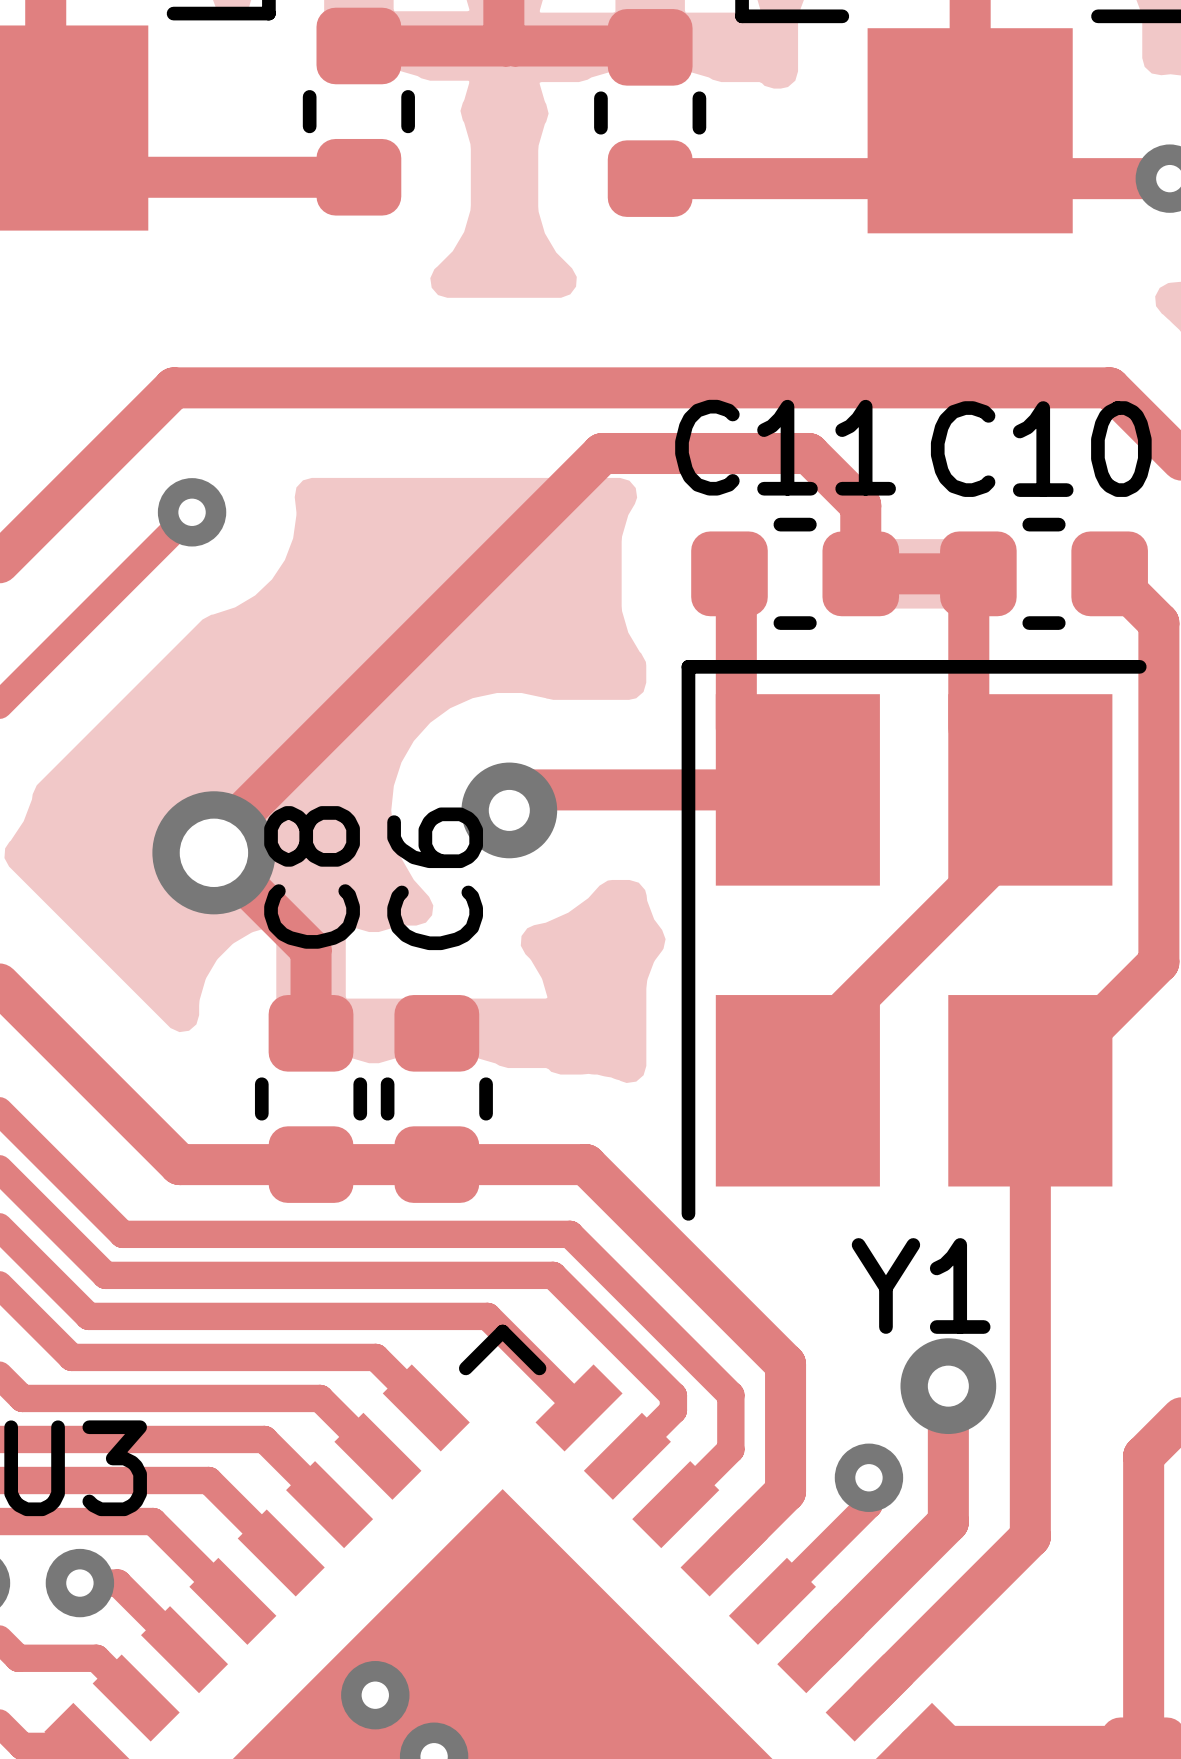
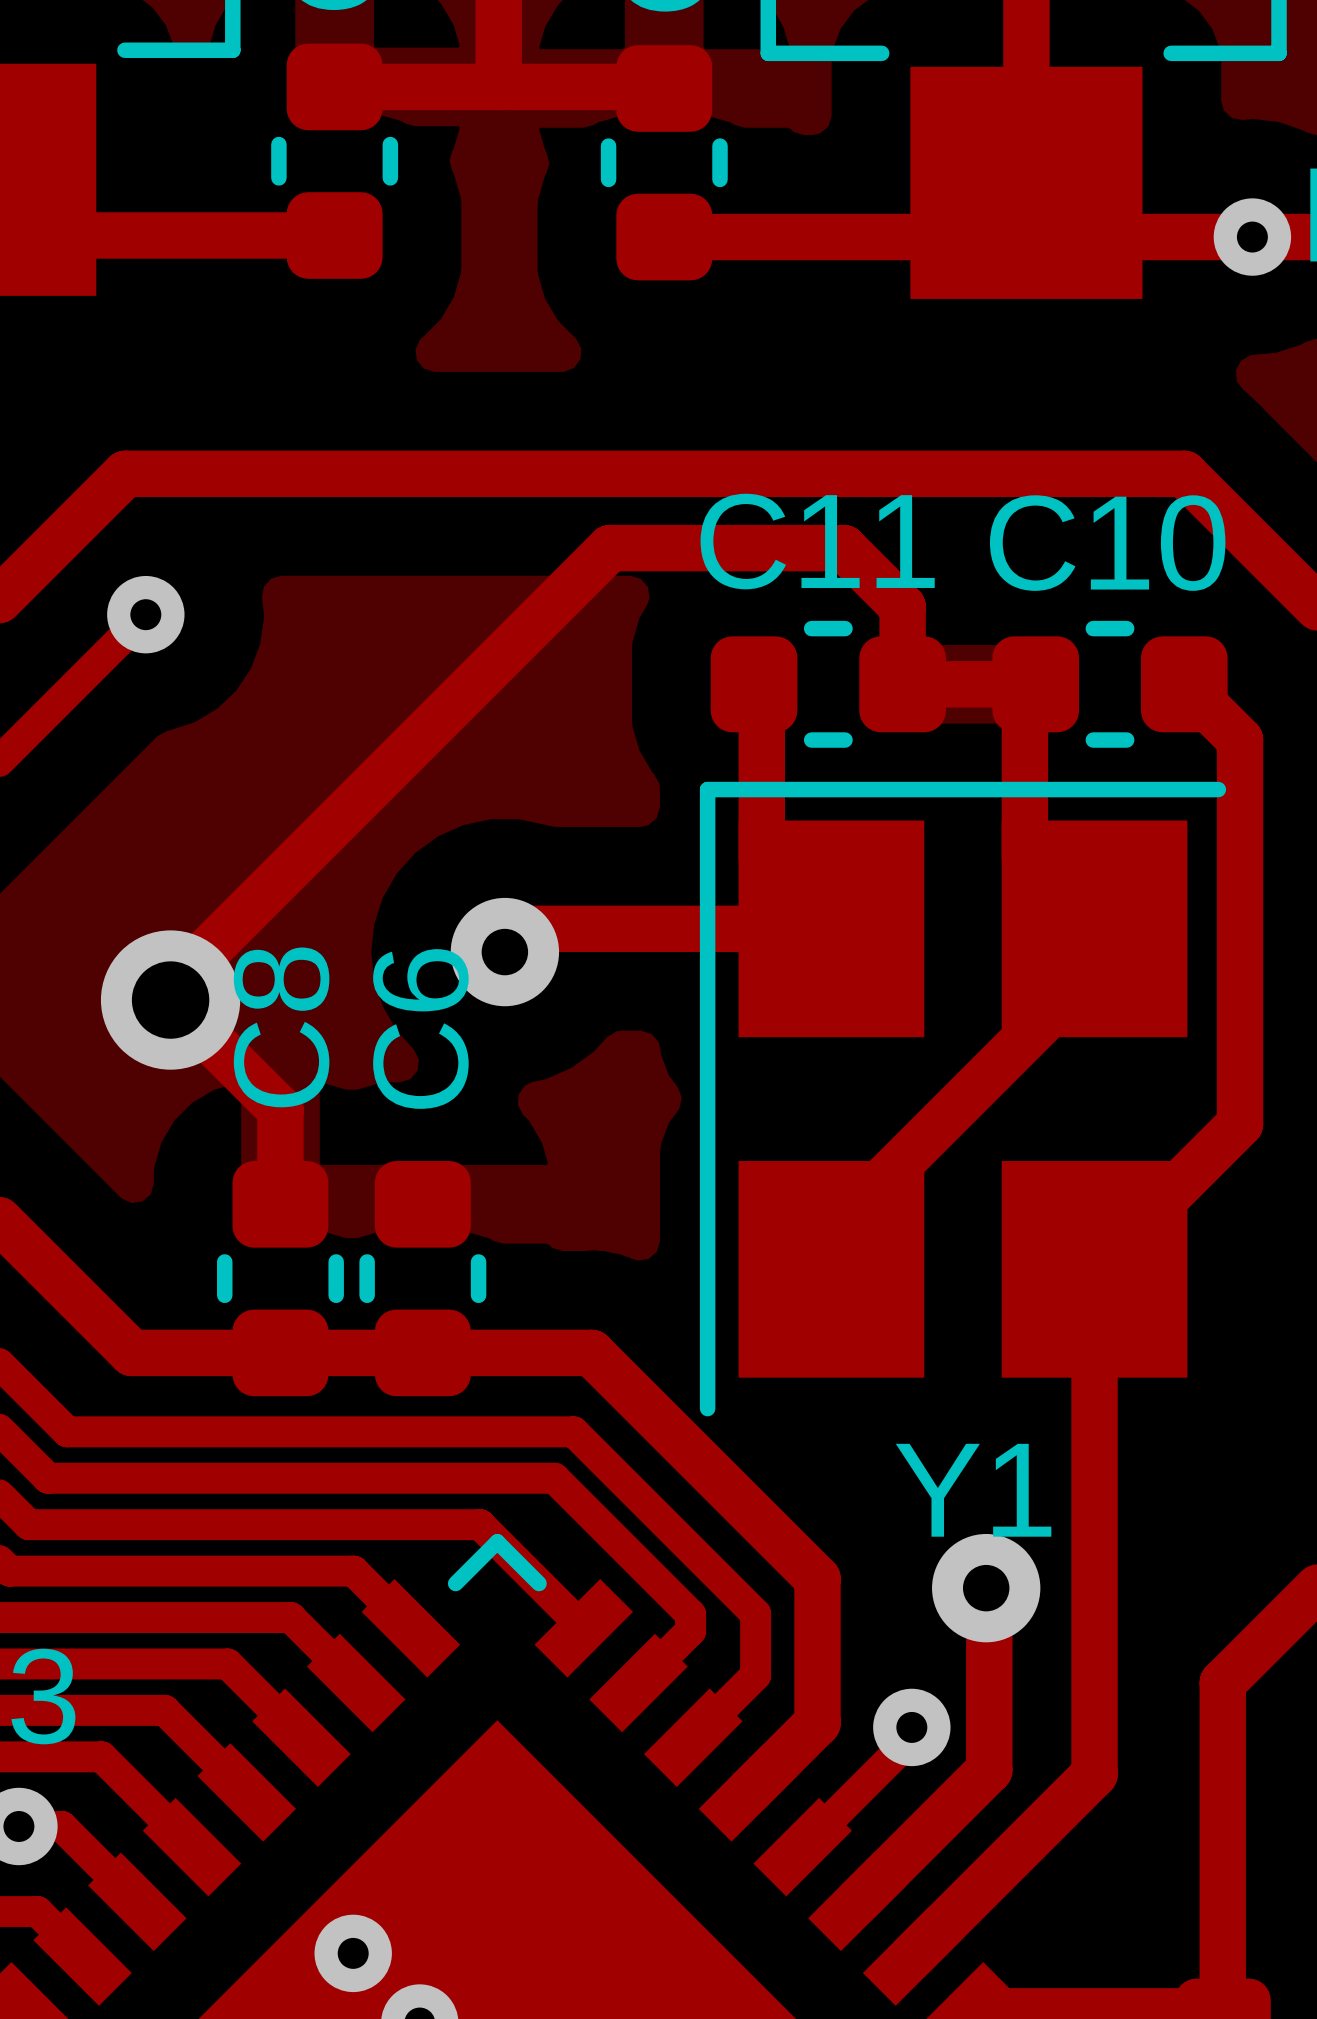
track: (948, 1386) (948, 1522) (937, 1533) -> (986, 1588) (989, 1591) (989, 1769)
via position: (948, 1386) -> (986, 1588)
via position: (868, 1477) -> (911, 1727)

